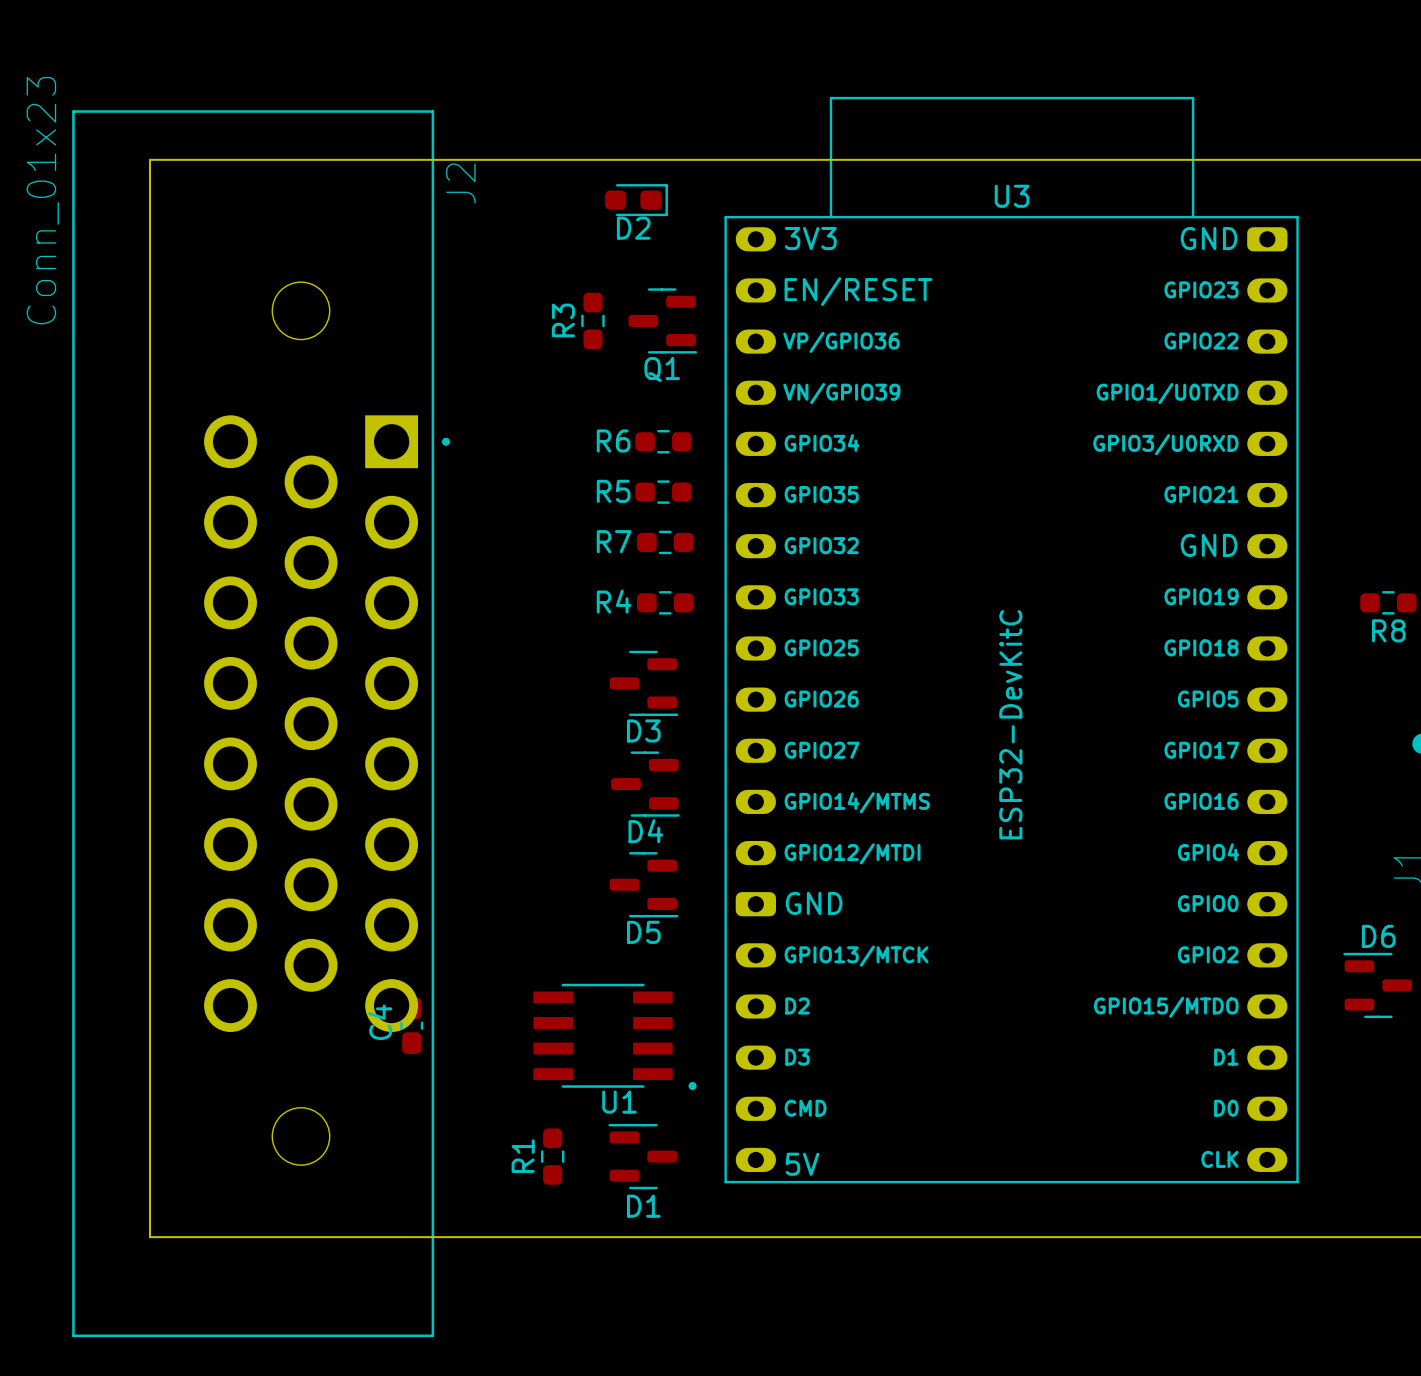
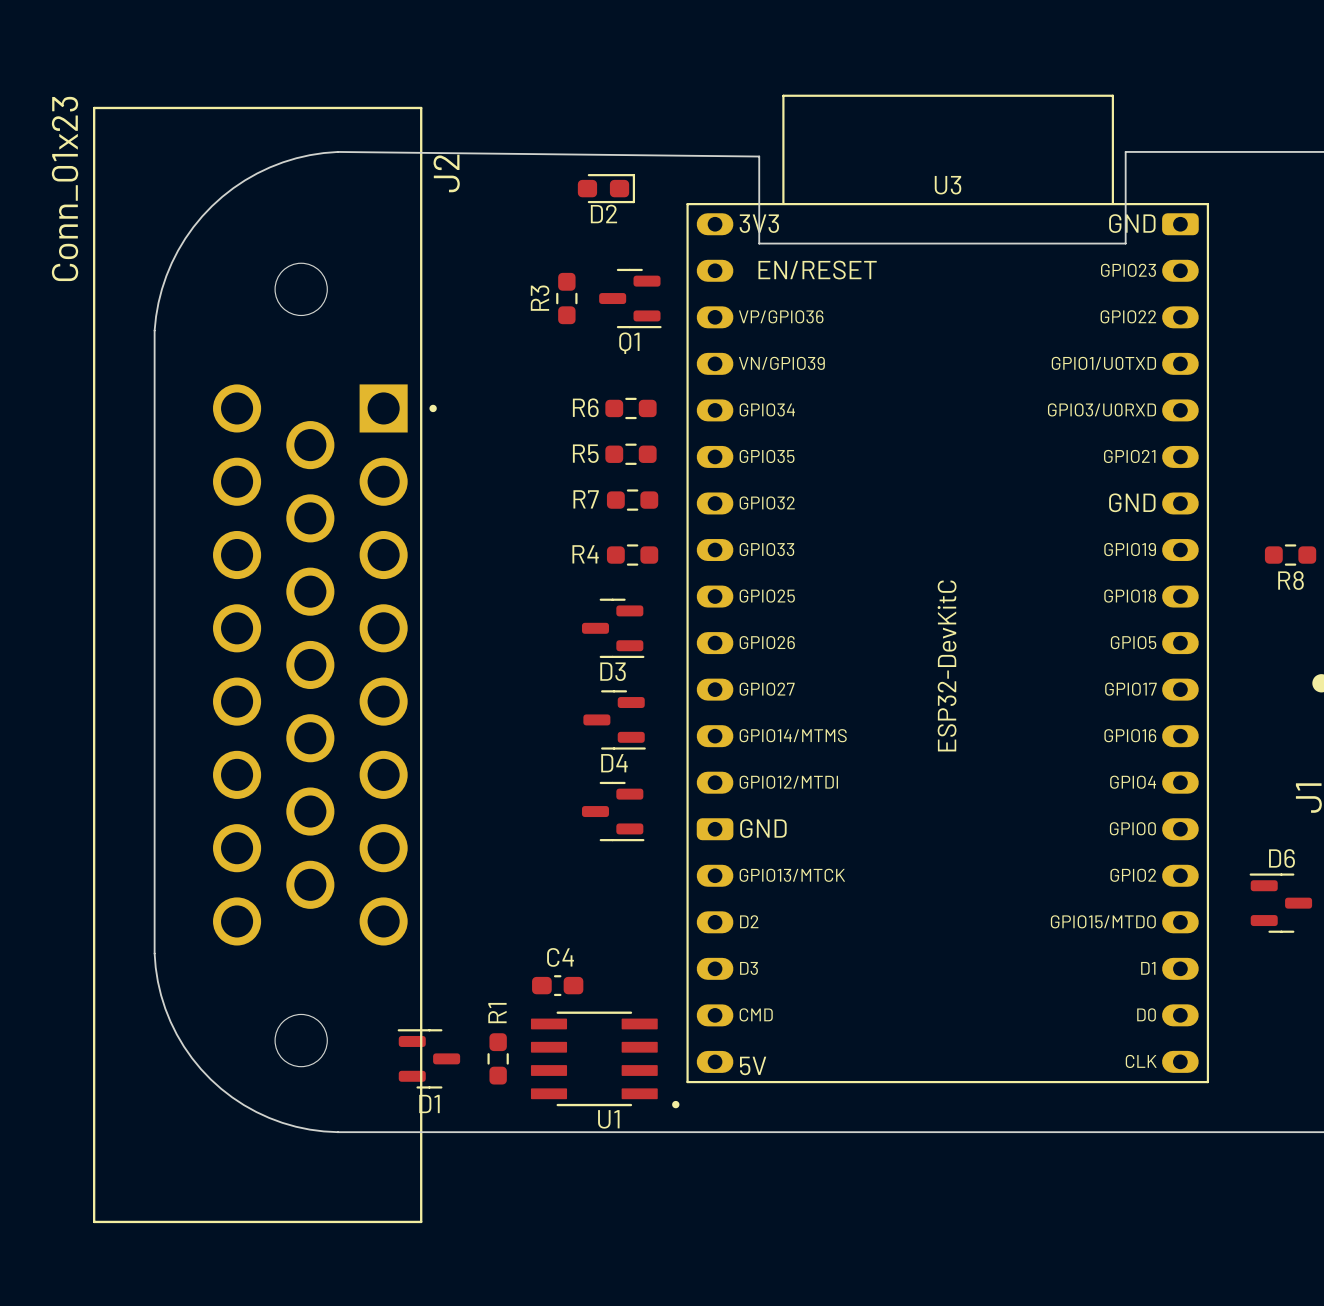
board edge: (1207, 159) (149, 159) (149, 1237) (341, 1237) -> (1125, 151) (1125, 243) (759, 243) (759, 156) (323, 153) (282, 162) (245, 180) (211, 206) (193, 227) (178, 250) (166, 275) (158, 302) (154, 330) (154, 953) (157, 981) (165, 1008) (176, 1034) (192, 1058) (221, 1088) (244, 1105) (269, 1117) (309, 1129) (337, 1132)
D5 name: D5 (643, 932) -> none
C4 rotation: 0° (411, 1025) -> 90° clockwise (557, 985)
C4 position: (411, 1025) -> (557, 985)
U1 position: (614, 1036) -> (605, 1059)
R1 name position: R1 (523, 1156) -> R1 (497, 1013)
R1 position: (552, 1156) -> (498, 1058)
D1 position: (642, 1156) -> (428, 1058)

